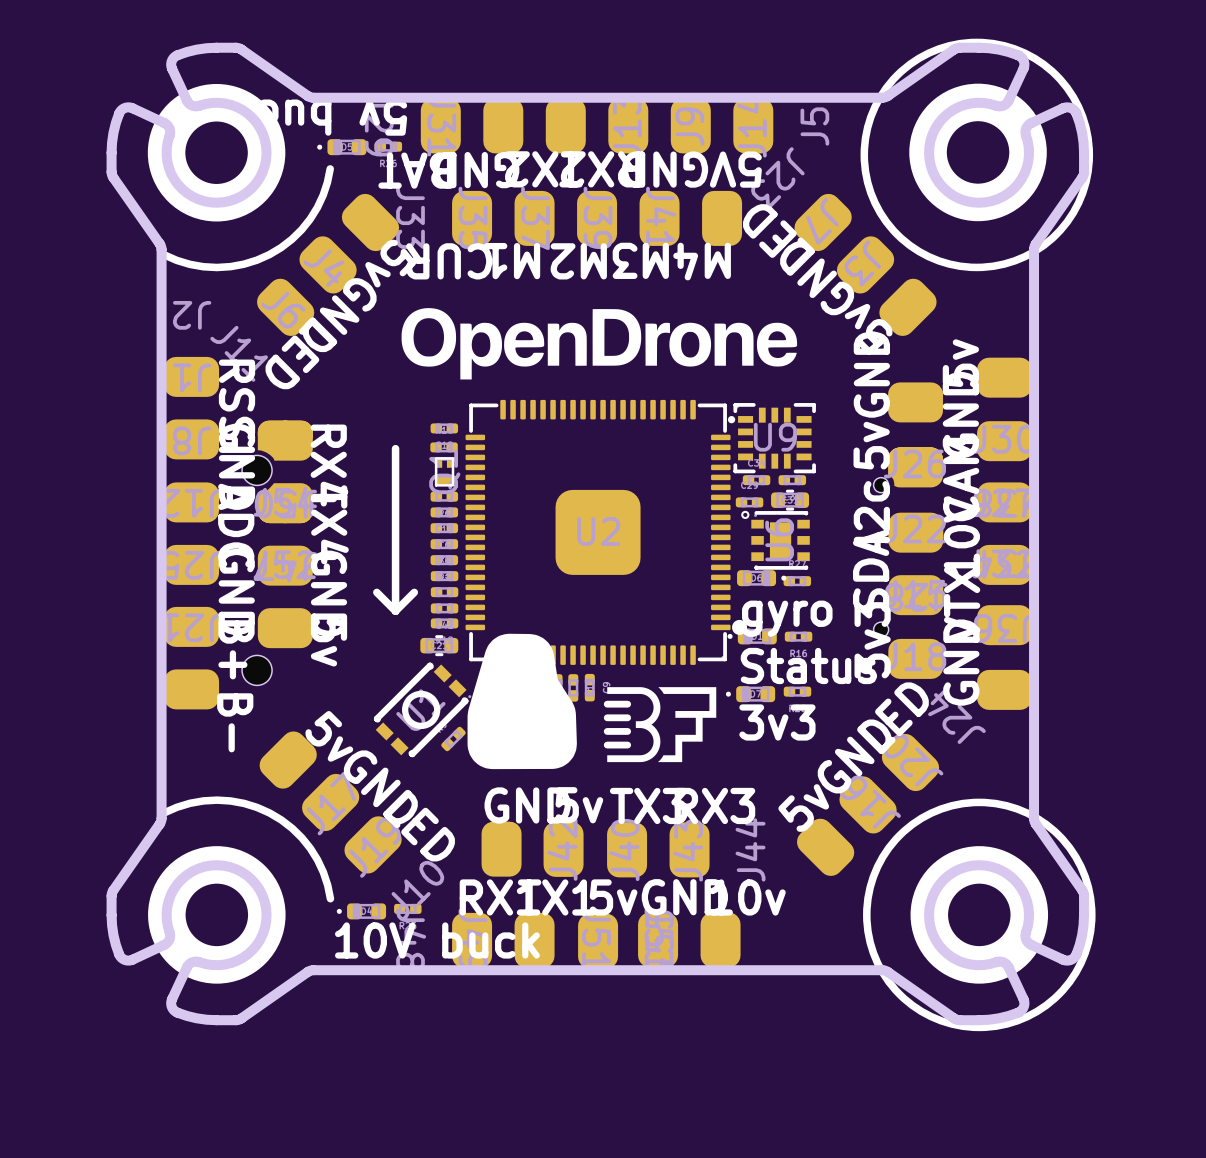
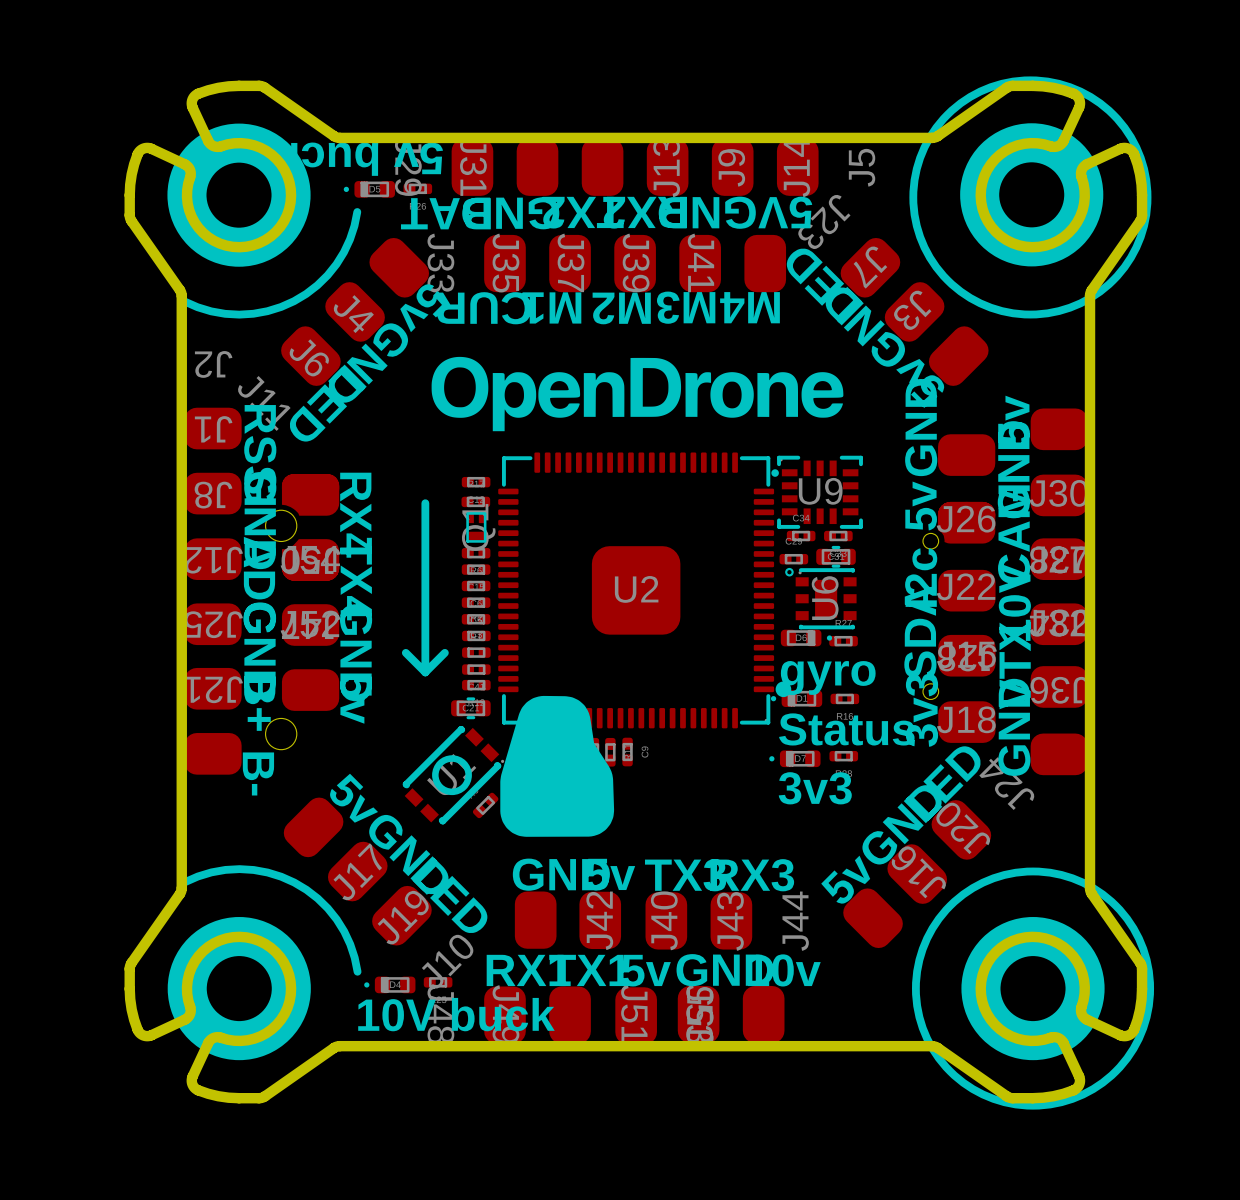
drawing: [607, 687, 717, 763] -> none
line: (607, 704) (627, 704) -> none
line: (607, 717) (627, 717) -> none
line: (607, 731) (627, 731) -> none
line: (607, 745) (627, 745) -> none

